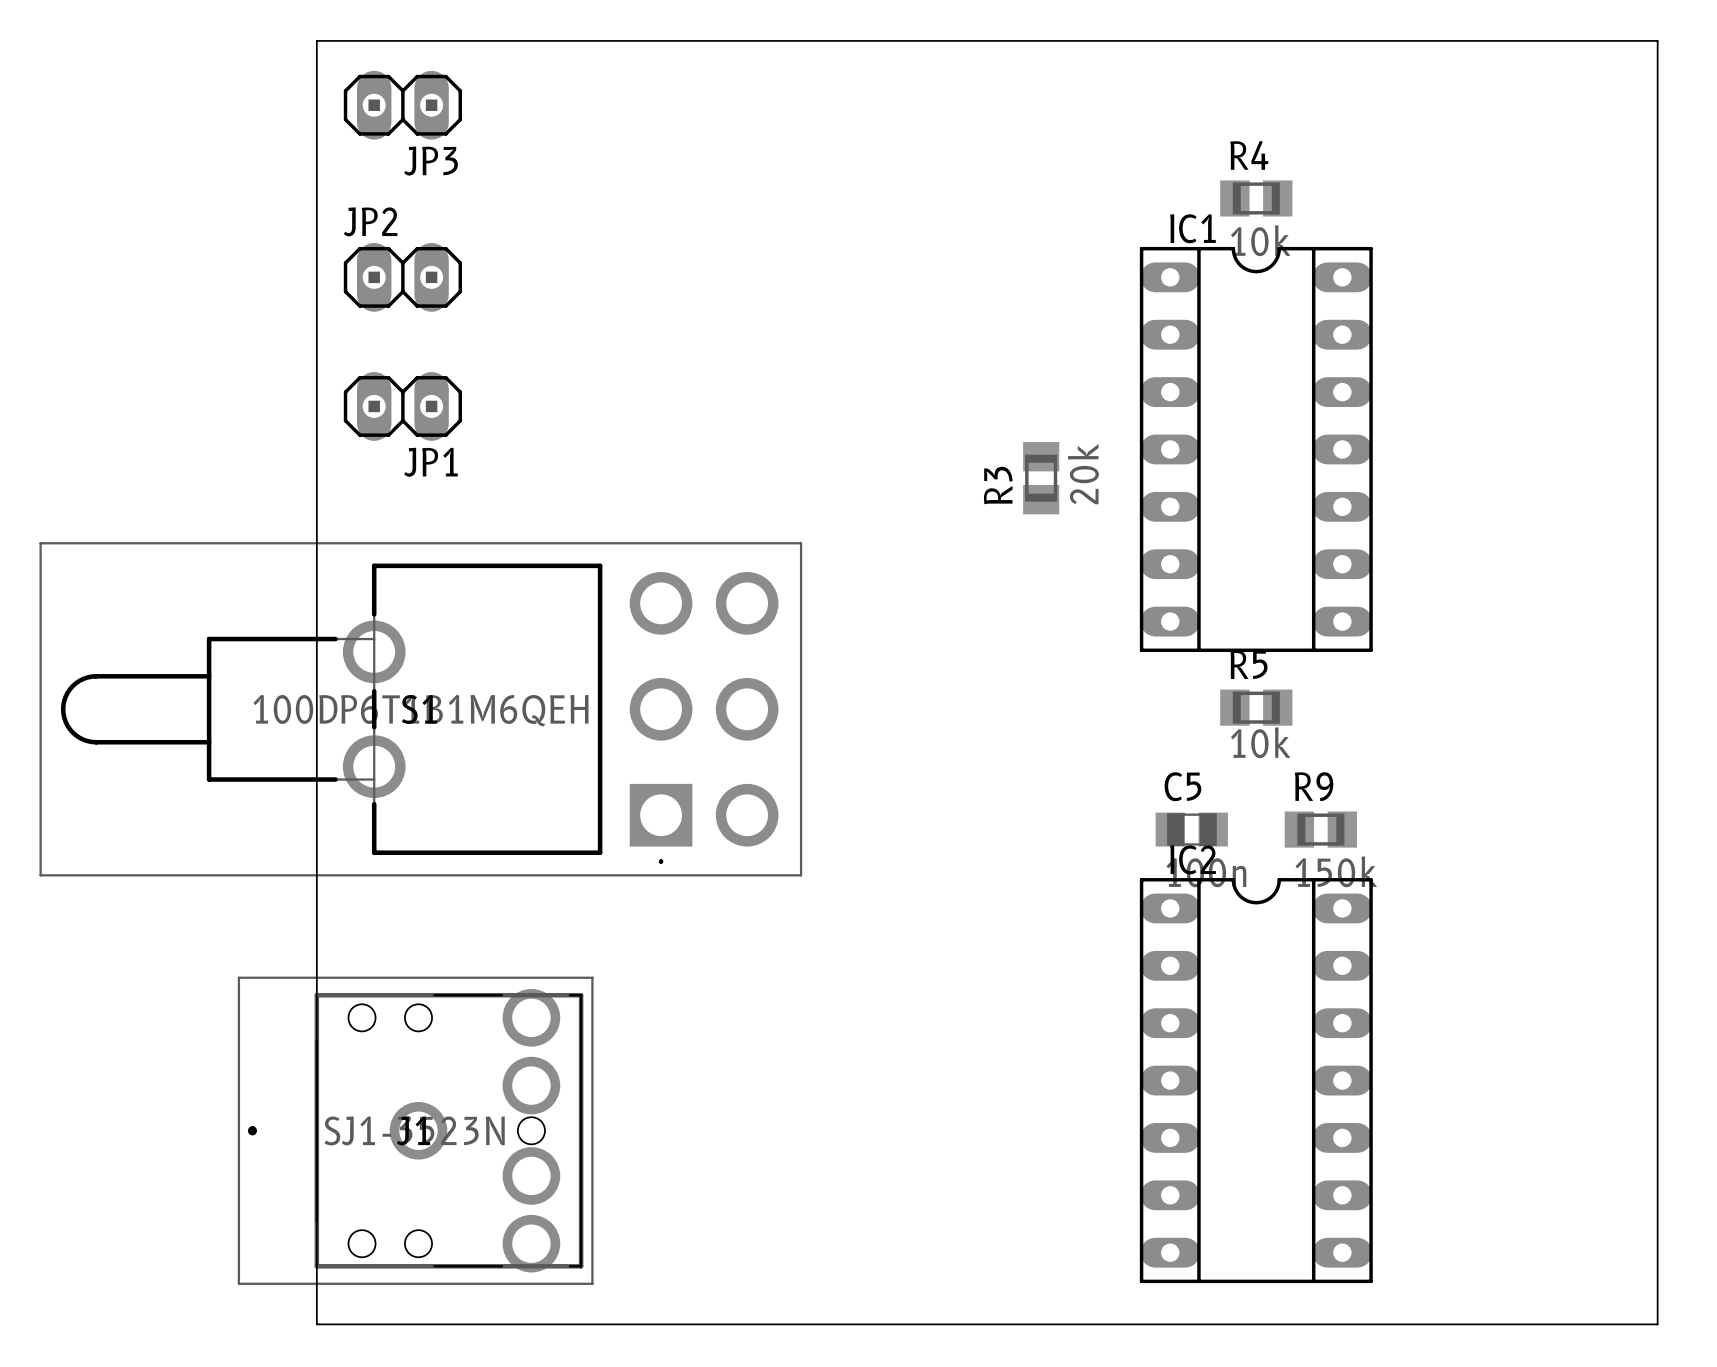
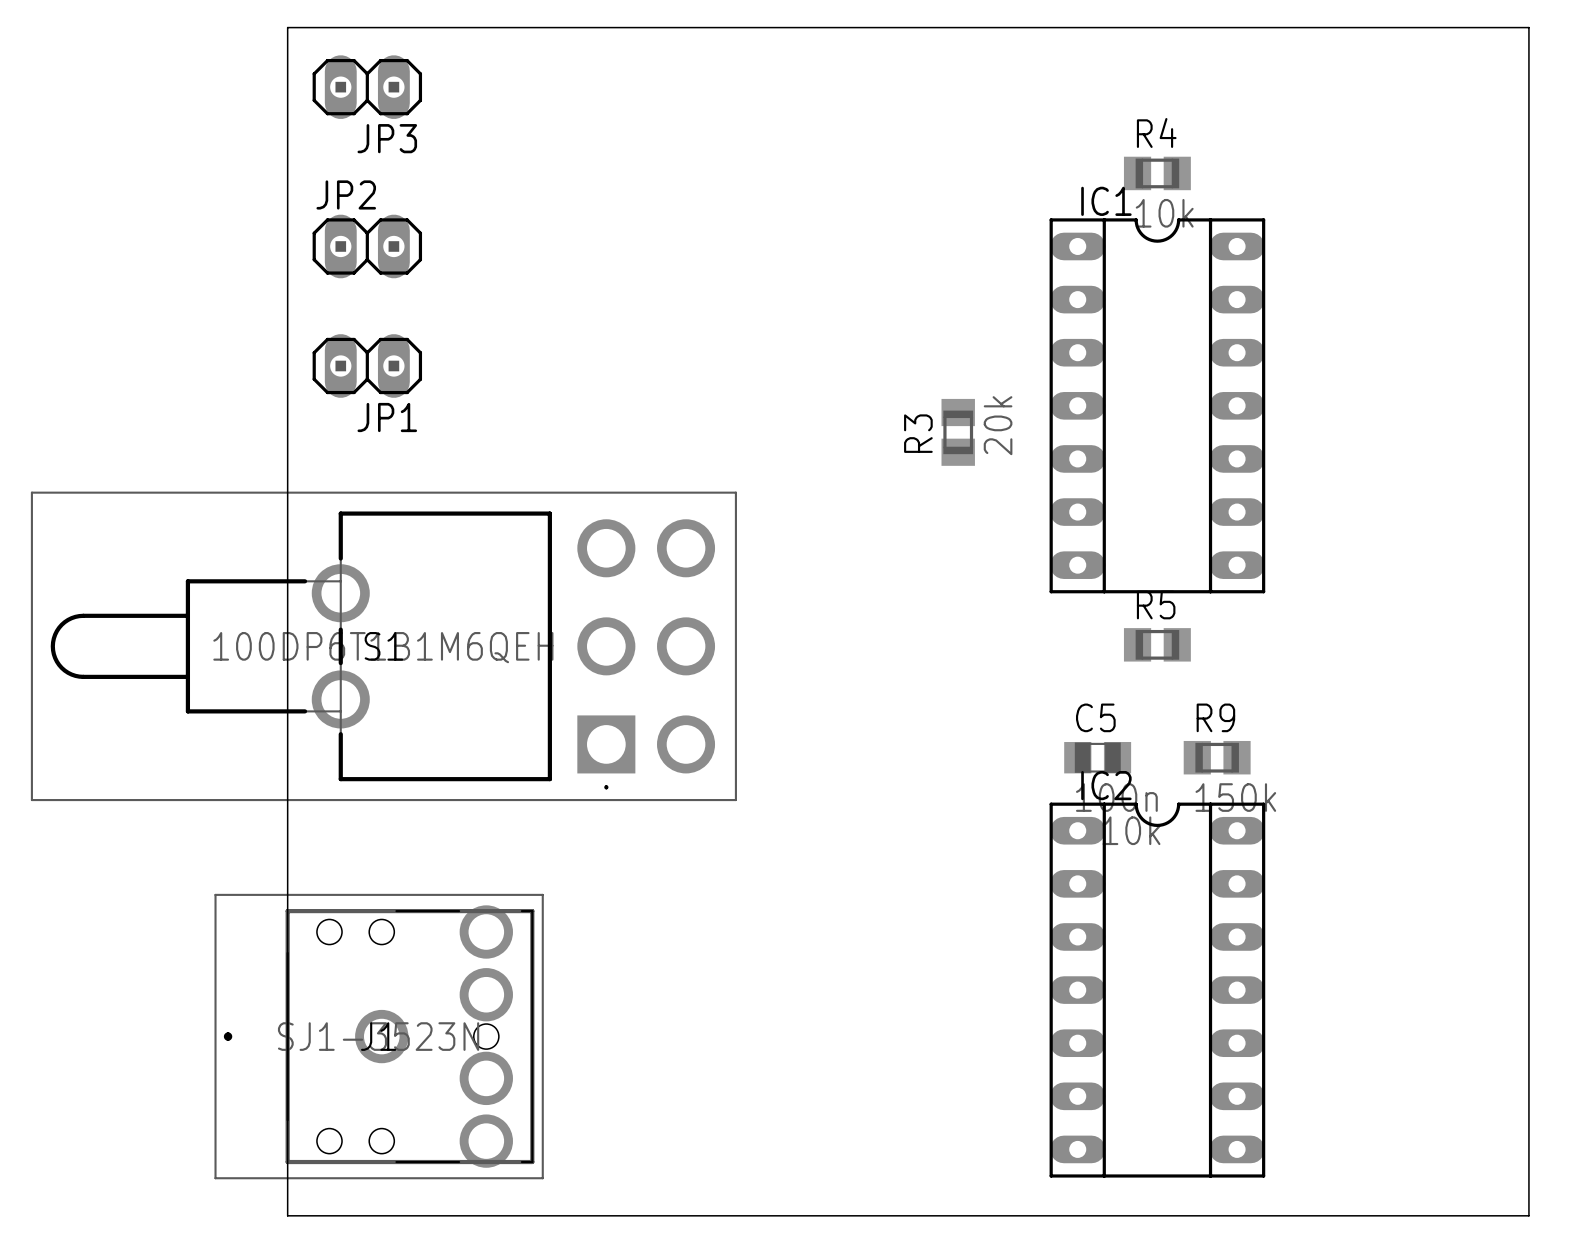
R5 value position: 10k (1260, 742) -> 10k (1131, 830)

